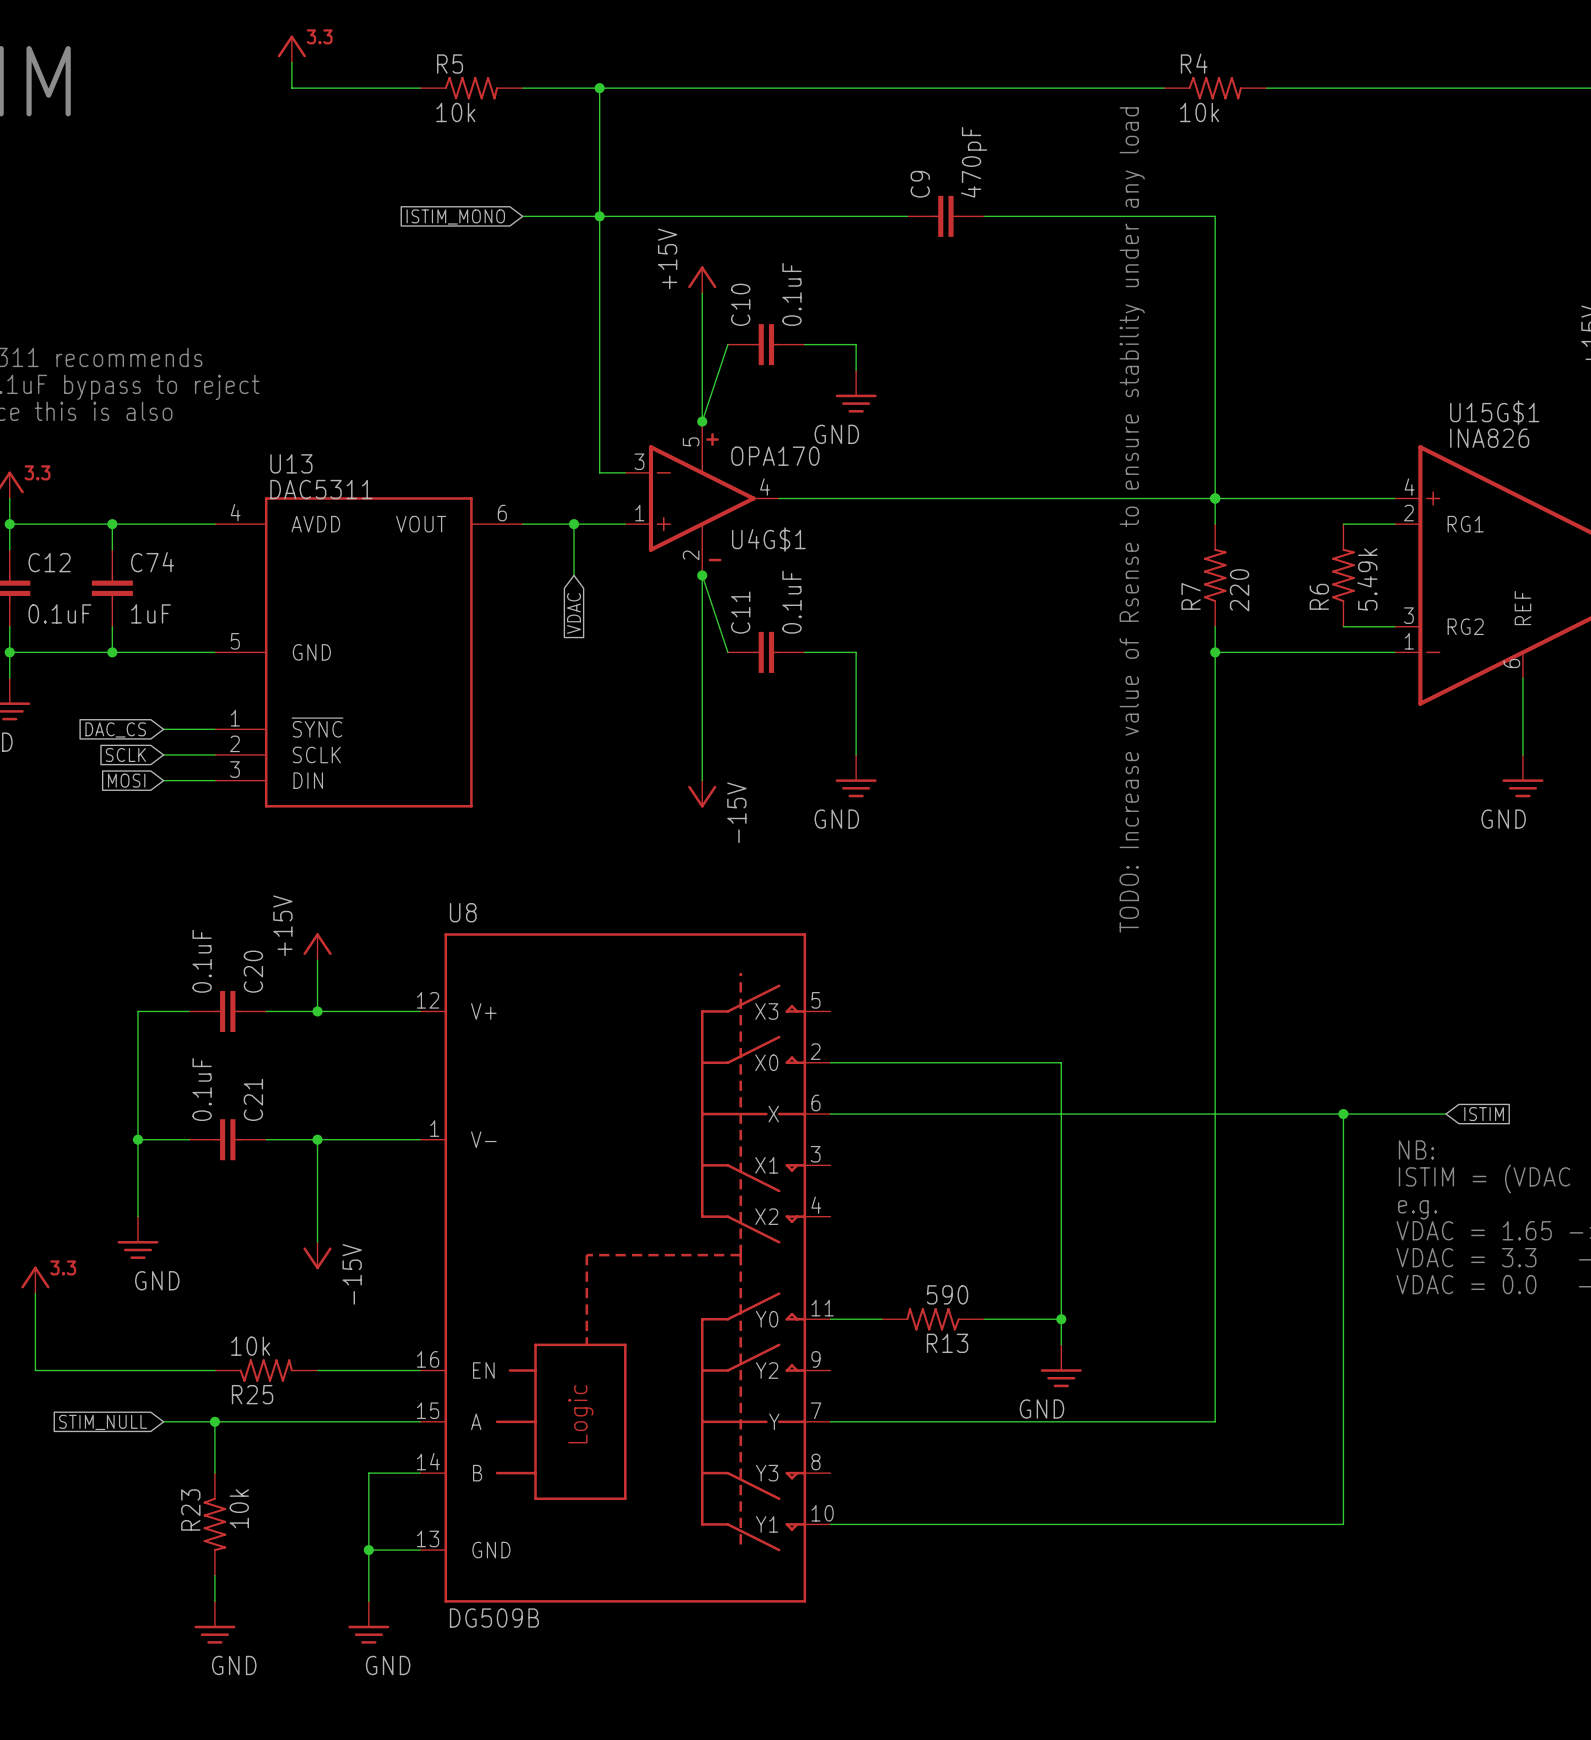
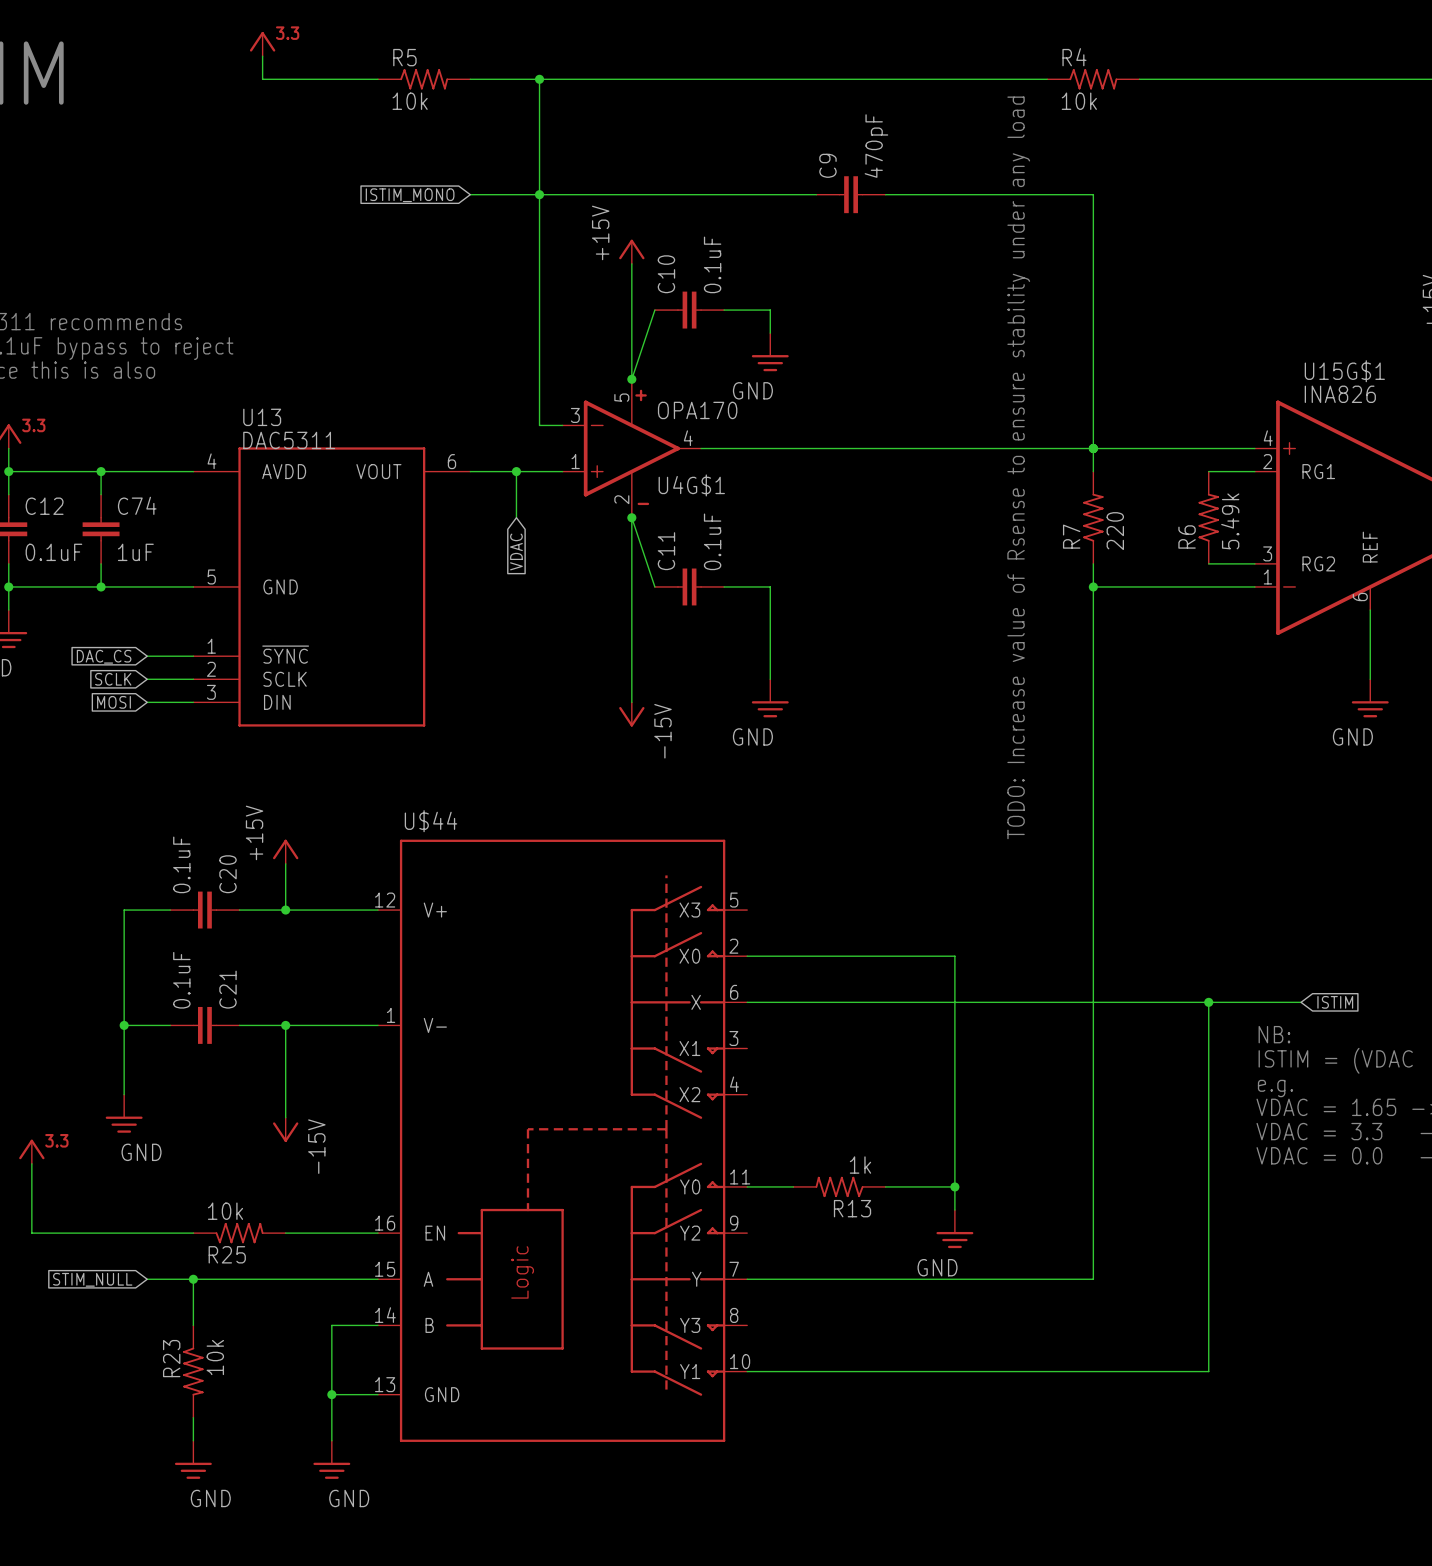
U8 name: U8 (463, 912) -> U$44 (430, 821)
R13 value: 590 (947, 1294) -> 1k (860, 1165)
U8 value: DG509B (494, 1618) -> none

